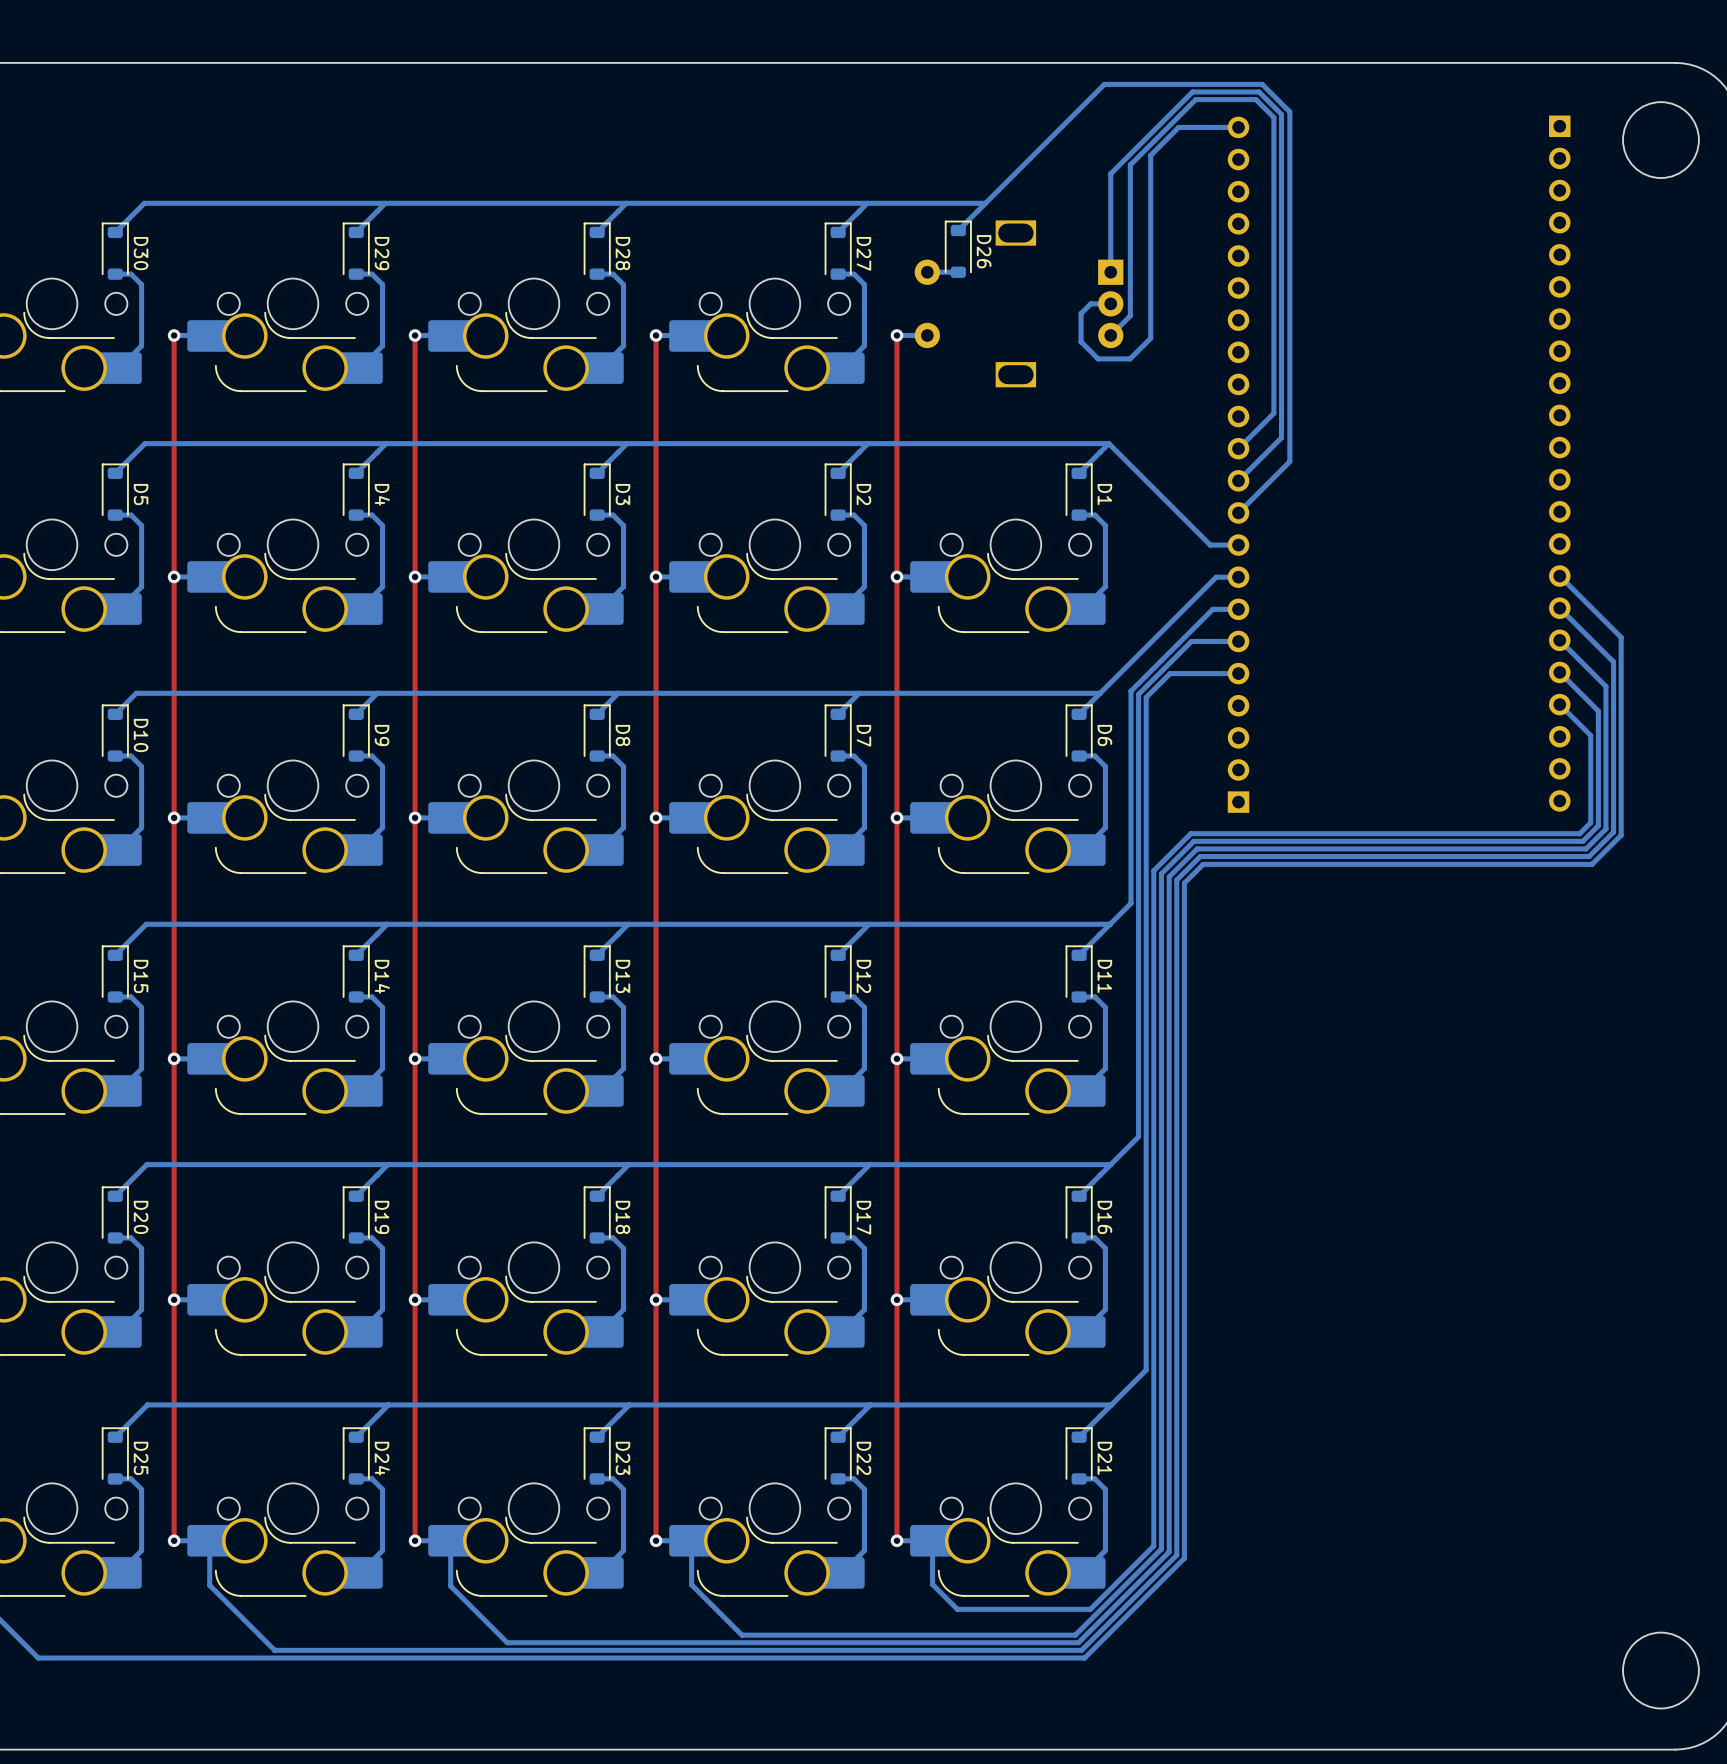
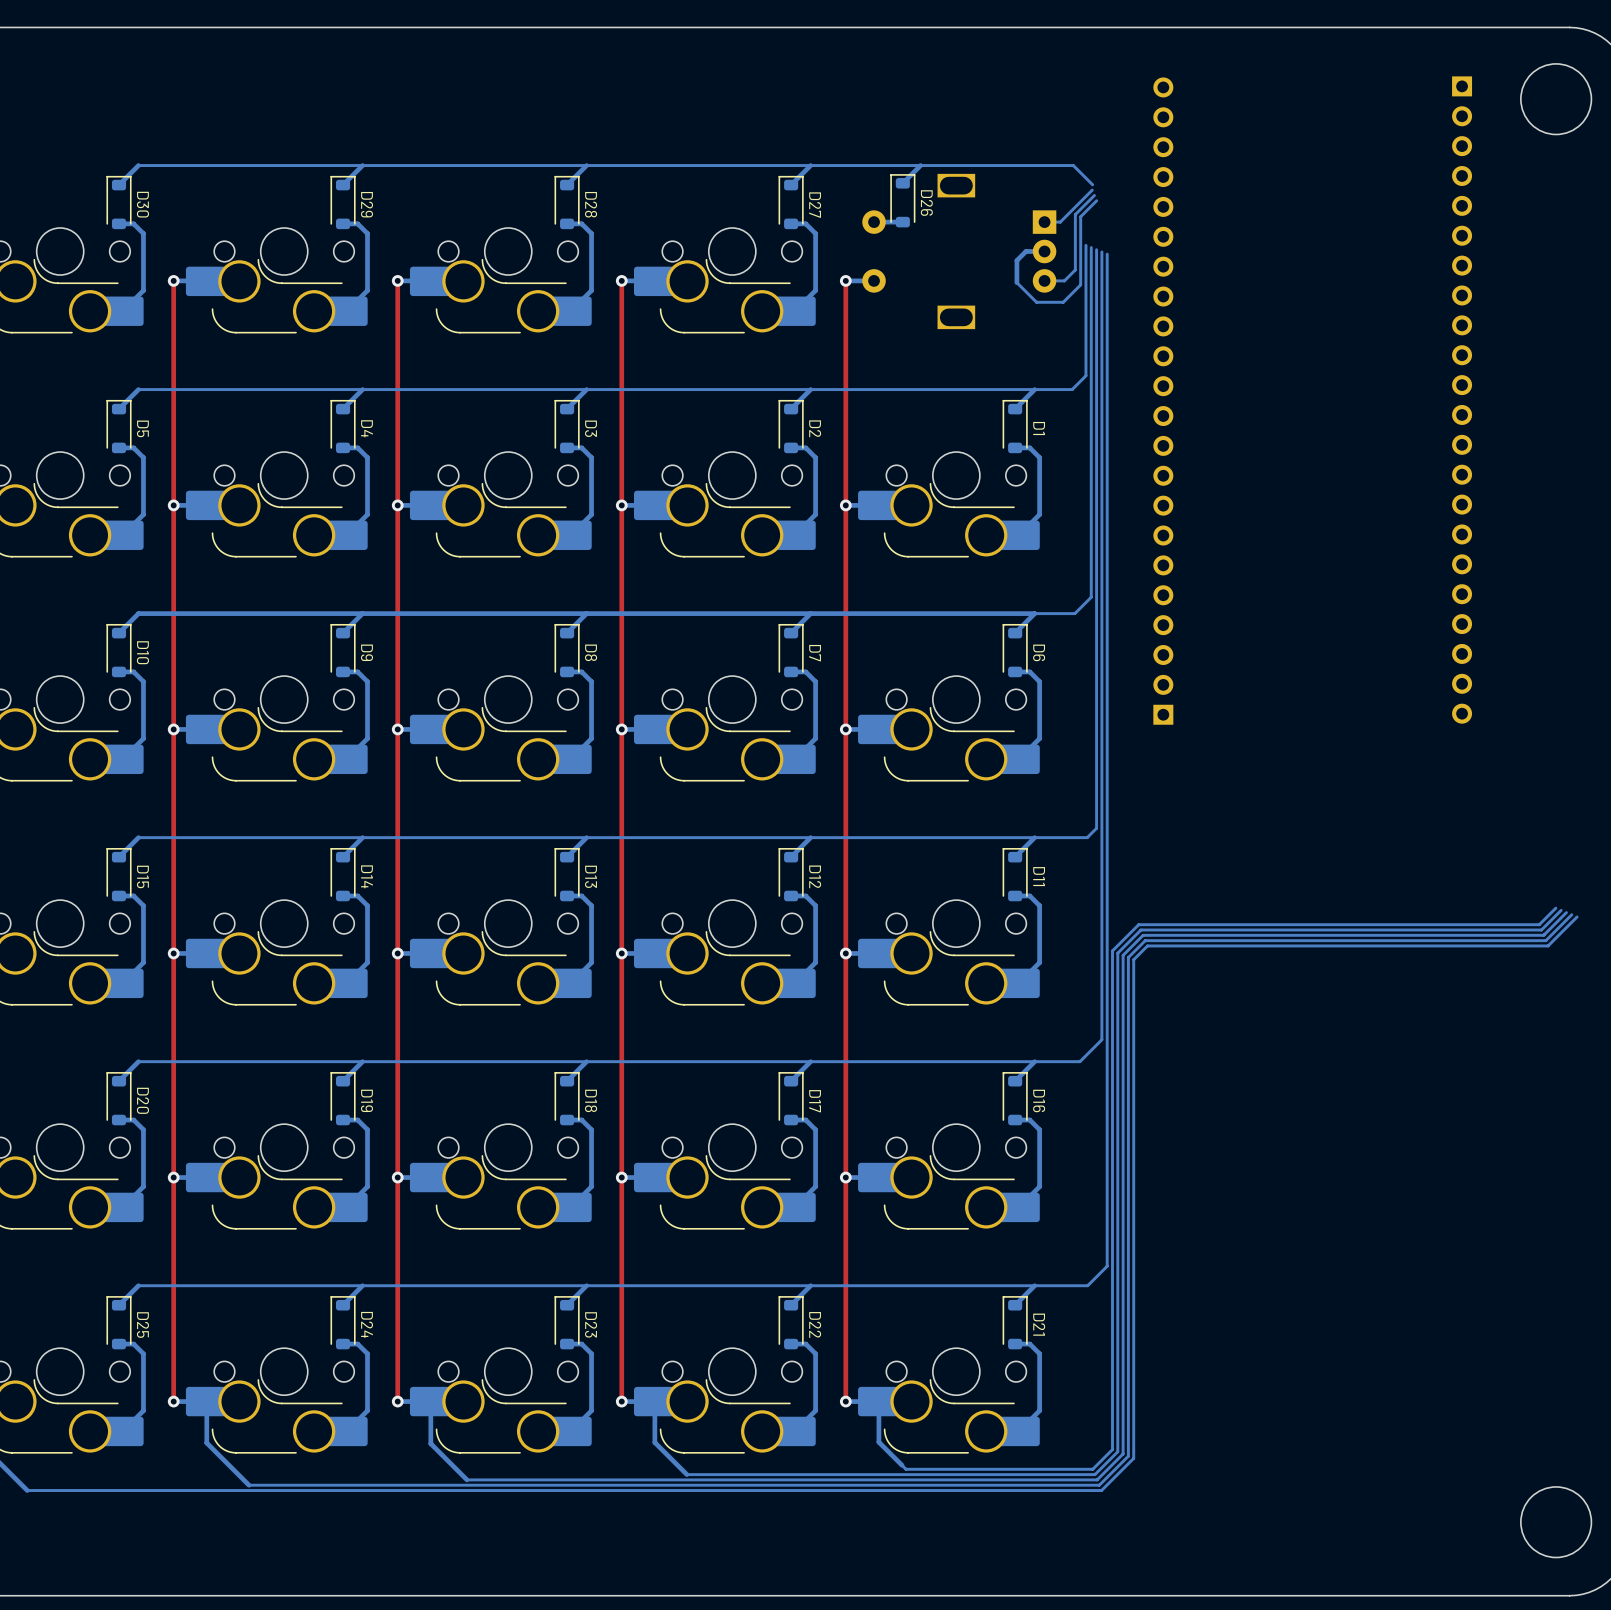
bottom track: (1238, 127) (1178, 127) (1150, 155) (1150, 338) (1130, 358) (1098, 358) (1081, 341) (1081, 337) -> (1096, 200) (1080, 216) (1080, 284) (1063, 302) (1036, 302) (1016, 282)
bottom track: (385, 203) (377, 211) -> none
bottom track: (626, 203) (618, 211) -> none
bottom track: (867, 203) (859, 211) -> none
bottom track: (985, 203) (144, 203) (136, 211) -> (1092, 184) (1073, 165) (138, 165)
bottom track: (977, 211) (1104, 84) (1262, 84) (1289, 111) (1289, 461) (1238, 512) -> none
bottom track: (1110, 272) (1110, 173) (1192, 91) (1259, 91) (1281, 114) (1281, 437) (1238, 480) -> (1044, 222) (1060, 222) (1092, 190)
bottom track: (1110, 335) (1130, 315) (1130, 164) (1195, 99) (1255, 99) (1273, 117) (1273, 413) (1238, 448) -> (1044, 280) (1064, 280) (1075, 269) (1075, 214) (1094, 195)
bottom track: (385, 443) (377, 452) -> none
bottom track: (626, 443) (618, 452) -> none
bottom track: (867, 443) (859, 452) -> none
bottom track: (1108, 443) (145, 443) (136, 452) -> (1085, 245) (1085, 375) (1072, 389) (138, 389)
bottom track: (1108, 443) (1100, 452) -> none
bottom track: (1108, 443) (1210, 545) (1238, 545) -> none
bottom track: (1559, 576) (1621, 637) (1621, 835) (1592, 864) (1203, 864) (1184, 883) (1184, 1558) (1084, 1658) (38, 1658) (16, 1636) -> (1577, 916) (1548, 945) (1147, 945) (1133, 959) (1133, 1458) (1101, 1490) (27, 1490)
bottom track: (1238, 577) (1216, 577) (1100, 693) -> (1091, 247) (1091, 597) (1074, 613) (1034, 613)
bottom track: (1559, 608) (1613, 661) (1613, 832) (1589, 856) (1200, 856) (1176, 880) (1176, 1555) (1081, 1650) (274, 1650) (255, 1630) -> (1571, 914) (1545, 940) (1145, 940) (1128, 957) (1128, 1456) (1099, 1485) (248, 1485)
bottom track: (1238, 609) (1212, 609) (1130, 691) (1130, 903) (1100, 934) -> none
bottom track: (1559, 640) (1605, 686) (1605, 829) (1586, 848) (1197, 848) (1169, 876) (1169, 1552) (1078, 1642) (507, 1642) (489, 1625) -> (1566, 912) (1543, 935) (1143, 935) (1123, 955) (1123, 1453) (1097, 1479) (467, 1479)
bottom track: (1238, 641) (1191, 641) (1138, 694) (1138, 1136) (1100, 1175) -> none
bottom track: (1559, 672) (1598, 711) (1598, 825) (1582, 841) (1193, 841) (1161, 873) (1161, 1549) (1075, 1635) (741, 1635) (726, 1619) -> (1561, 910) (1541, 930) (1140, 930) (1117, 953) (1117, 1451) (1094, 1474) (686, 1474)
bottom track: (1238, 673) (1170, 673) (1146, 697) (1146, 1370) (1100, 1416) -> none
bottom track: (1559, 704) (1590, 735) (1590, 822) (1579, 833) (1190, 833) (1153, 870) (1153, 1545) (1090, 1609) (957, 1609) -> (1555, 908) (1539, 924) (1138, 924) (1112, 950) (1112, 1449) (1092, 1469) (906, 1469) (902, 1465)
bottom track: (387, 924) (377, 934) -> none
bottom track: (628, 924) (618, 934) -> none
bottom track: (869, 924) (859, 934) -> none
bottom track: (1110, 924) (146, 924) (136, 934) -> (1096, 249) (1096, 828) (1087, 837) (138, 837)
bottom track: (387, 1164) (377, 1175) -> none
bottom track: (628, 1164) (618, 1175) -> none
bottom track: (869, 1164) (859, 1175) -> none
bottom track: (1110, 1164) (146, 1164) (136, 1175) -> (1101, 251) (1101, 1039) (1079, 1061) (138, 1061)
bottom track: (388, 1404) (377, 1416) -> none
bottom track: (629, 1404) (618, 1416) -> none
bottom track: (870, 1404) (859, 1416) -> none
bottom track: (1111, 1404) (147, 1404) (136, 1416) -> (1107, 254) (1107, 1266) (1087, 1285) (138, 1285)

